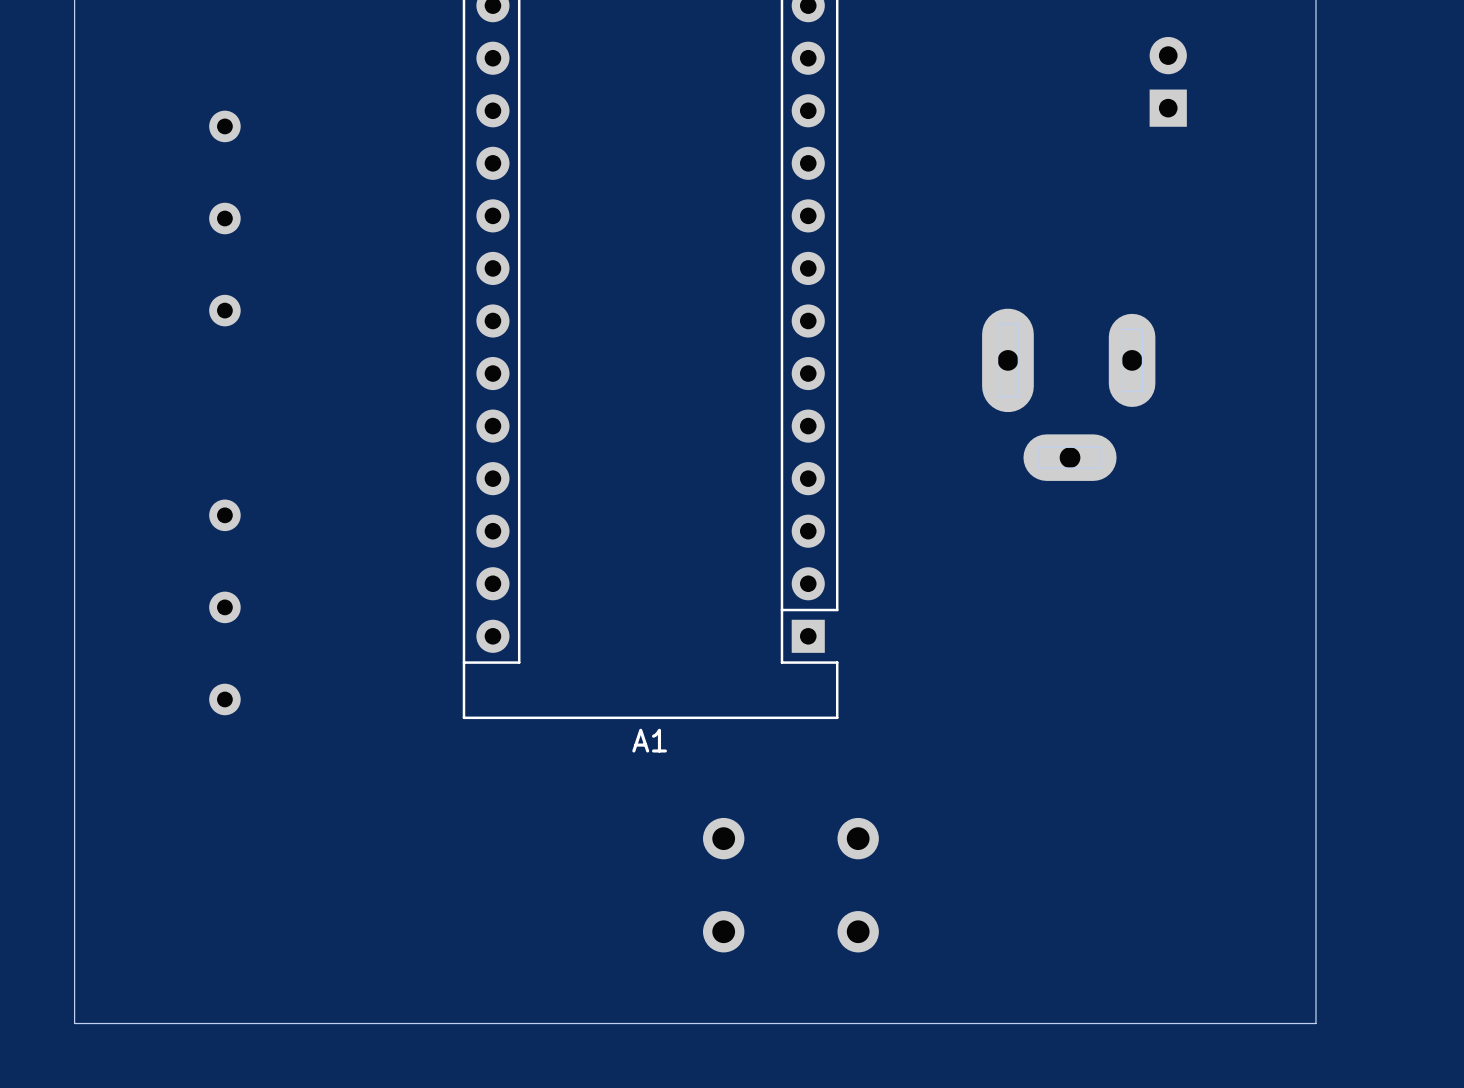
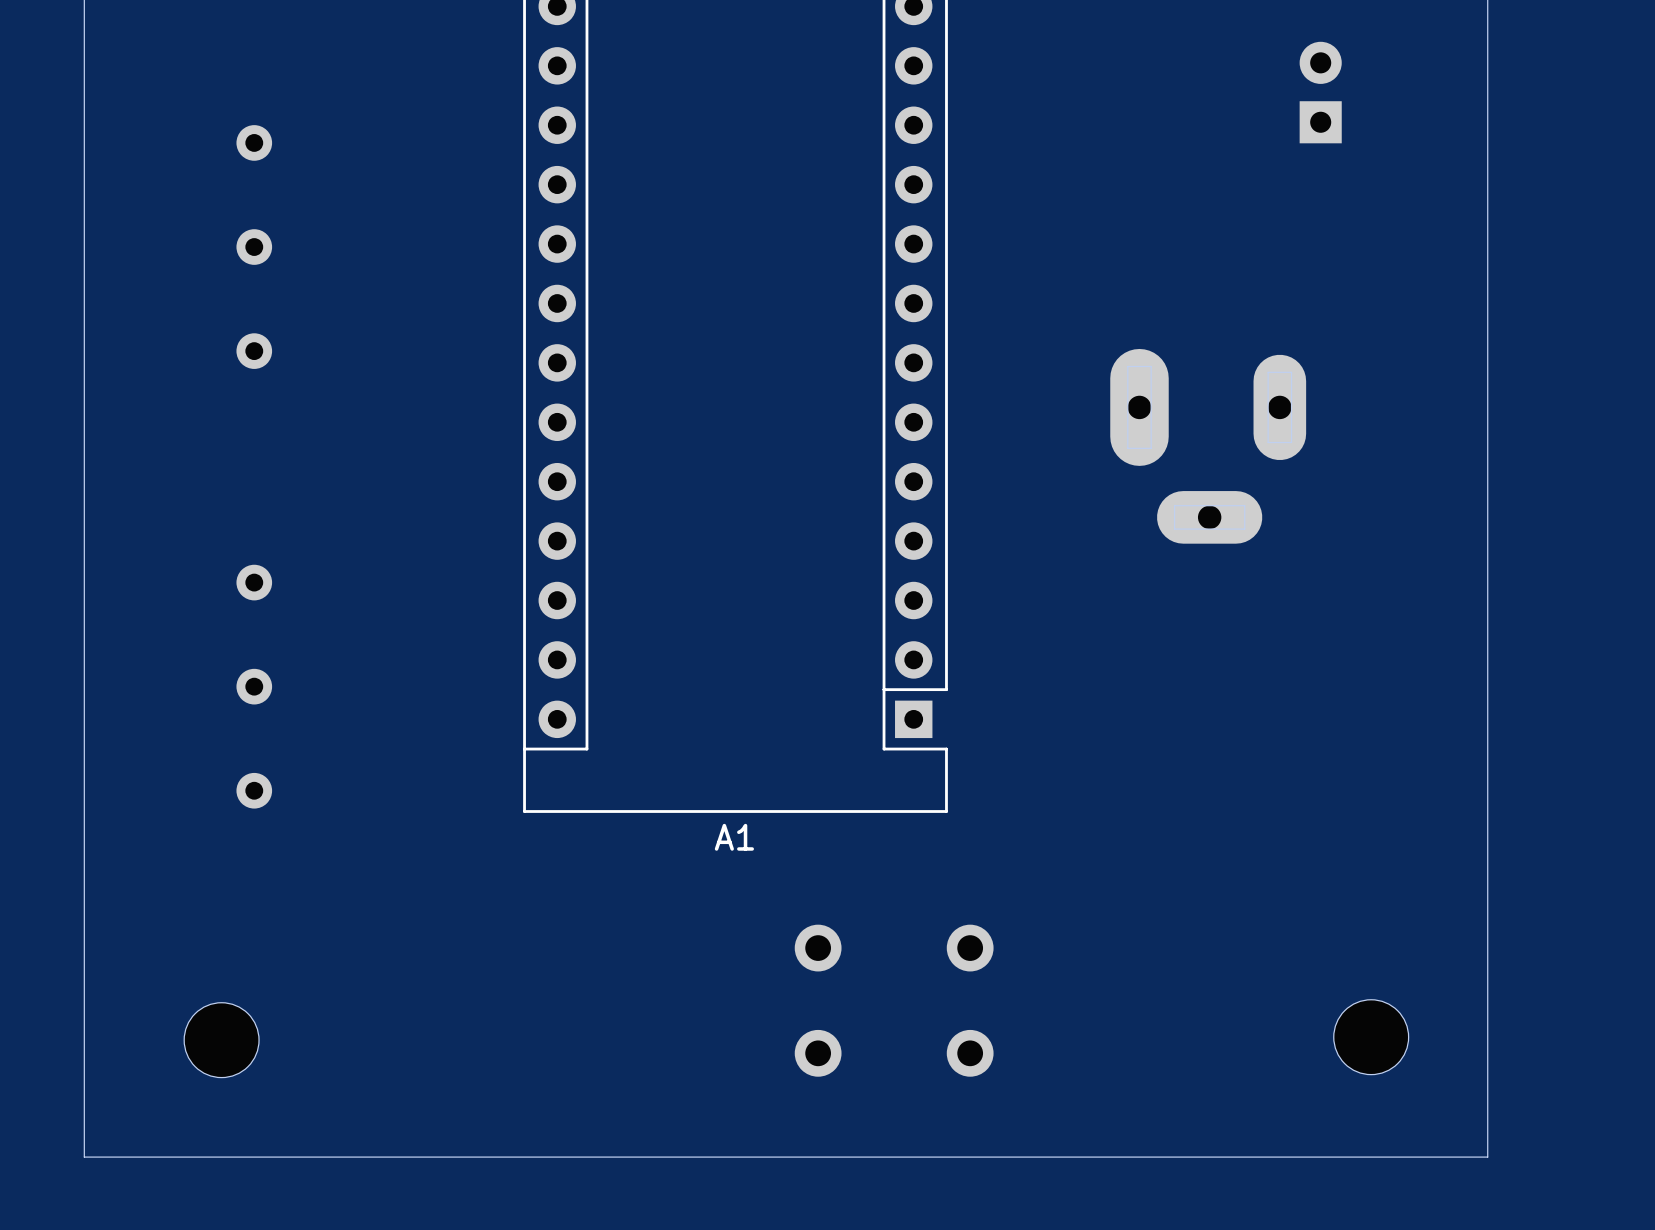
part: none -> (1371, 1037)
part: none -> (221, 1040)

